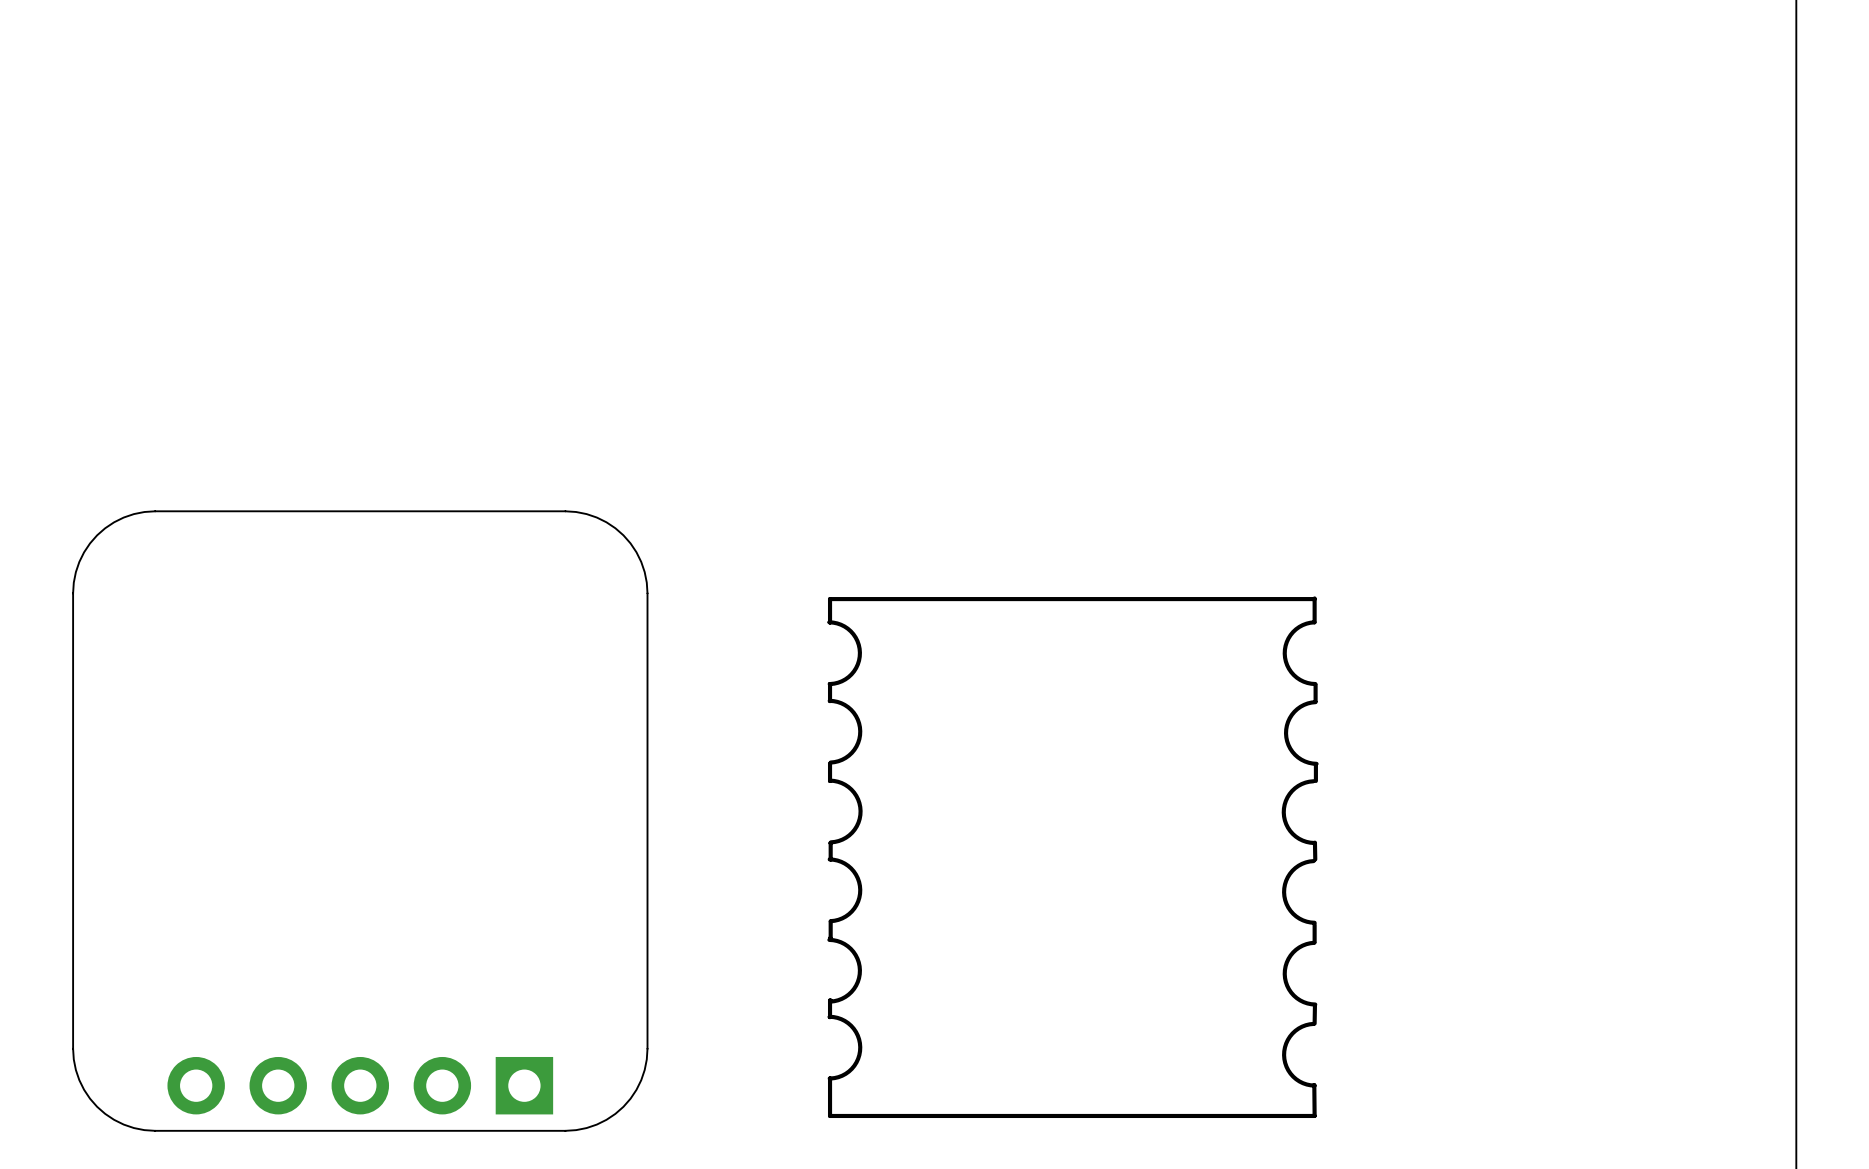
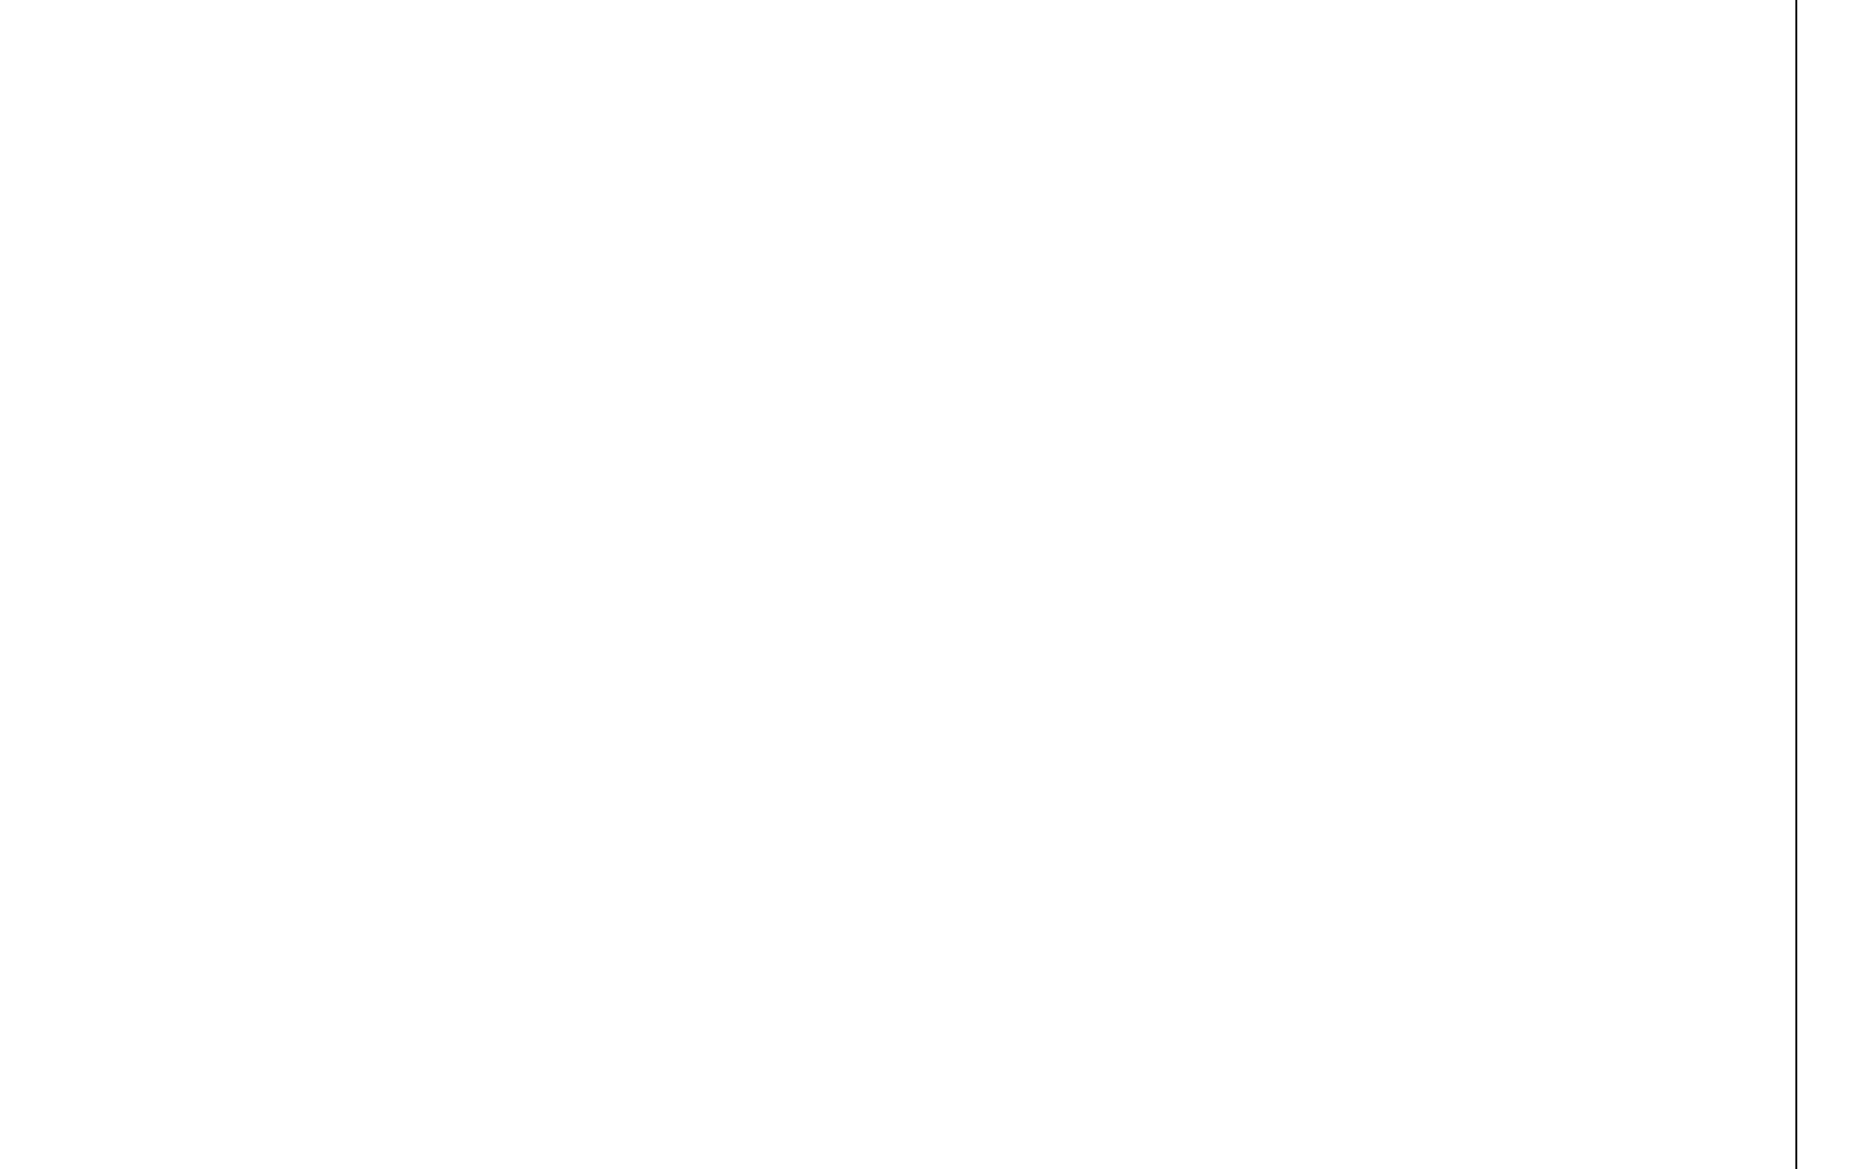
board edge: (565, 511) (144, 512) (114, 522) (90, 543) (75, 572) (73, 593) (73, 1048) (79, 1080) (90, 1098) (105, 1113) (133, 1128) (155, 1130) (565, 1130) (596, 1124) (615, 1113) (630, 1098) (644, 1070) (647, 1048) (646, 582) (641, 561) (623, 535) (596, 517) (565, 511) -> none
part: (1072, 857) -> none
part: (360, 1085) -> none

